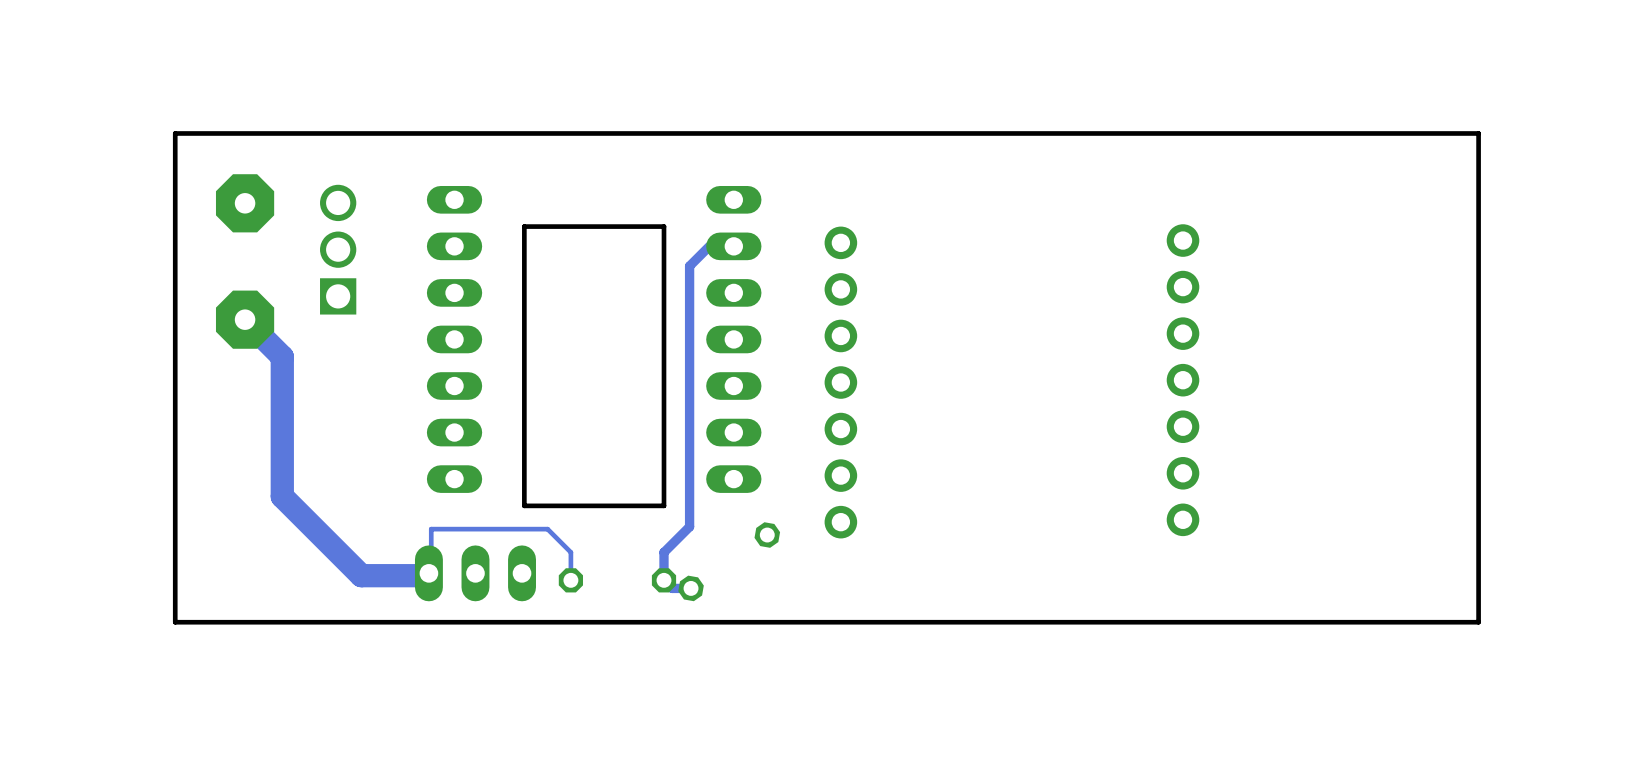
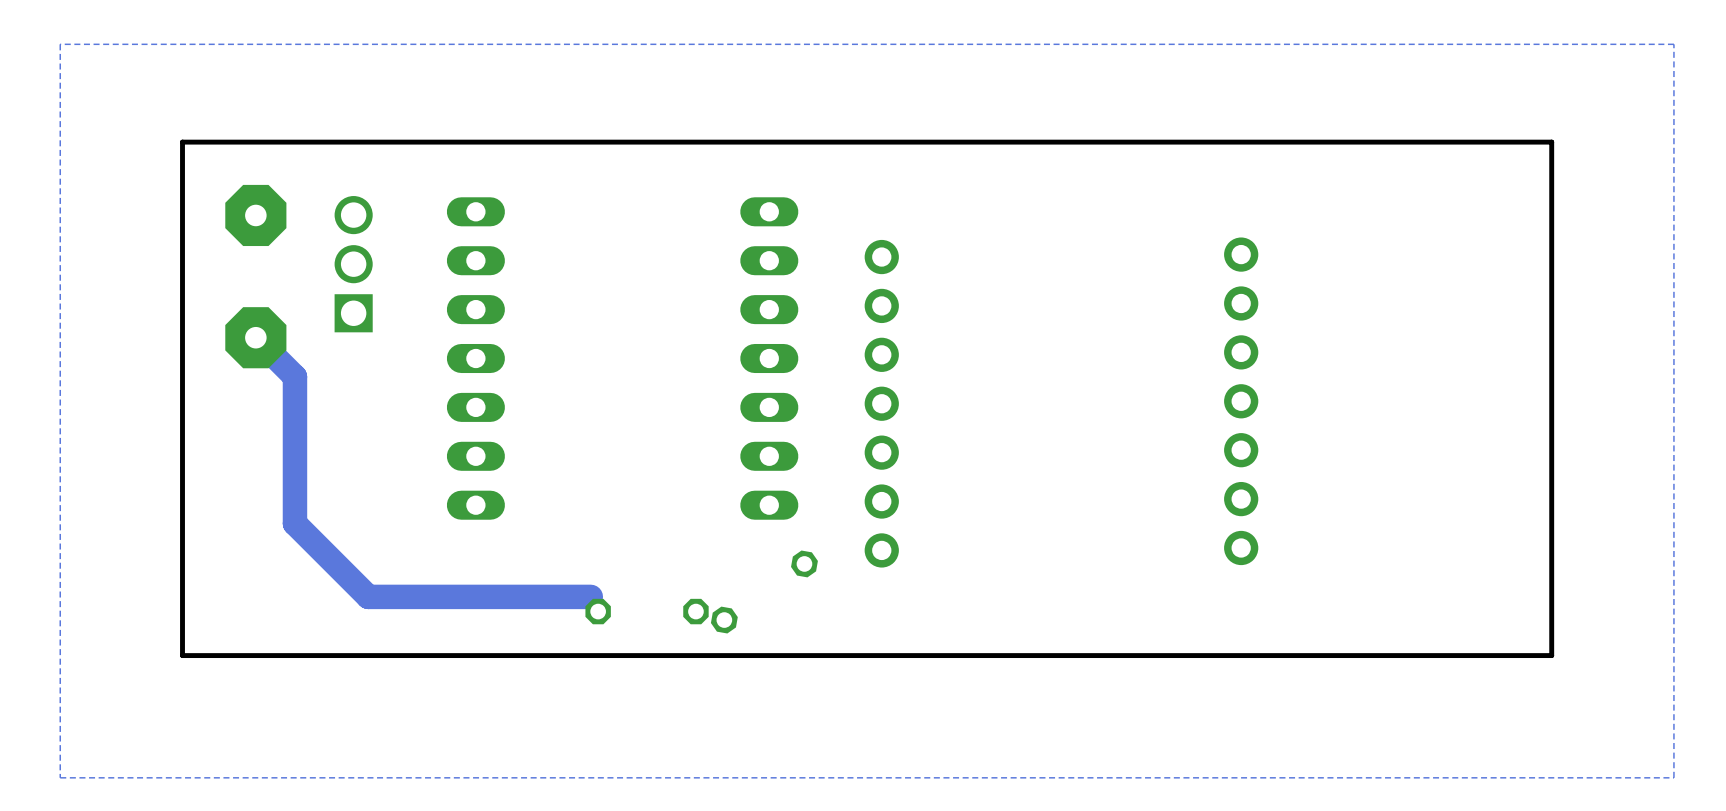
zone outline: none -> (1673, 44) (60, 44) (60, 777) (1673, 777) (1673, 44)
board edge: (663, 226) (524, 226) (524, 505) (663, 505) (663, 226) -> none
track: (733, 246) (709, 246) (689, 266) (689, 526) (663, 552) (663, 580) (672, 588) (691, 588) -> none
track: (352, 566) (361, 575) (426, 575) (431, 571) (431, 529) (547, 529) (570, 552) (570, 580) -> (368, 596) (590, 596)
part: (475, 573) -> none

